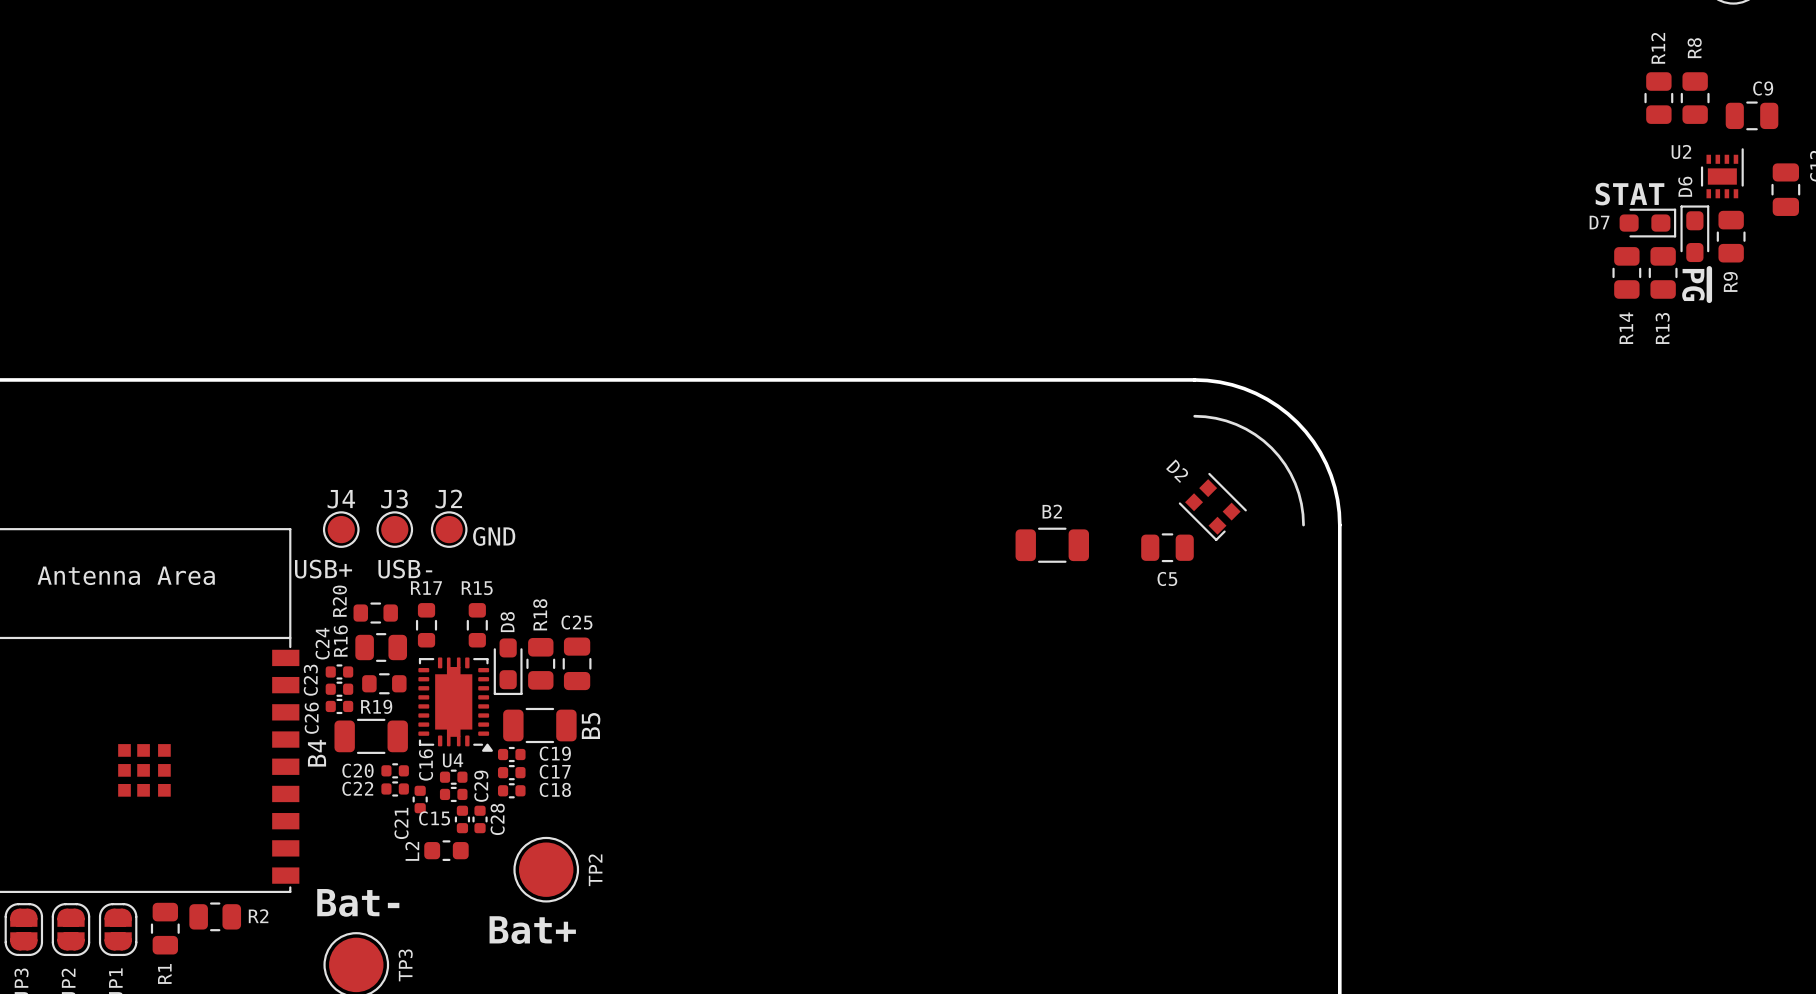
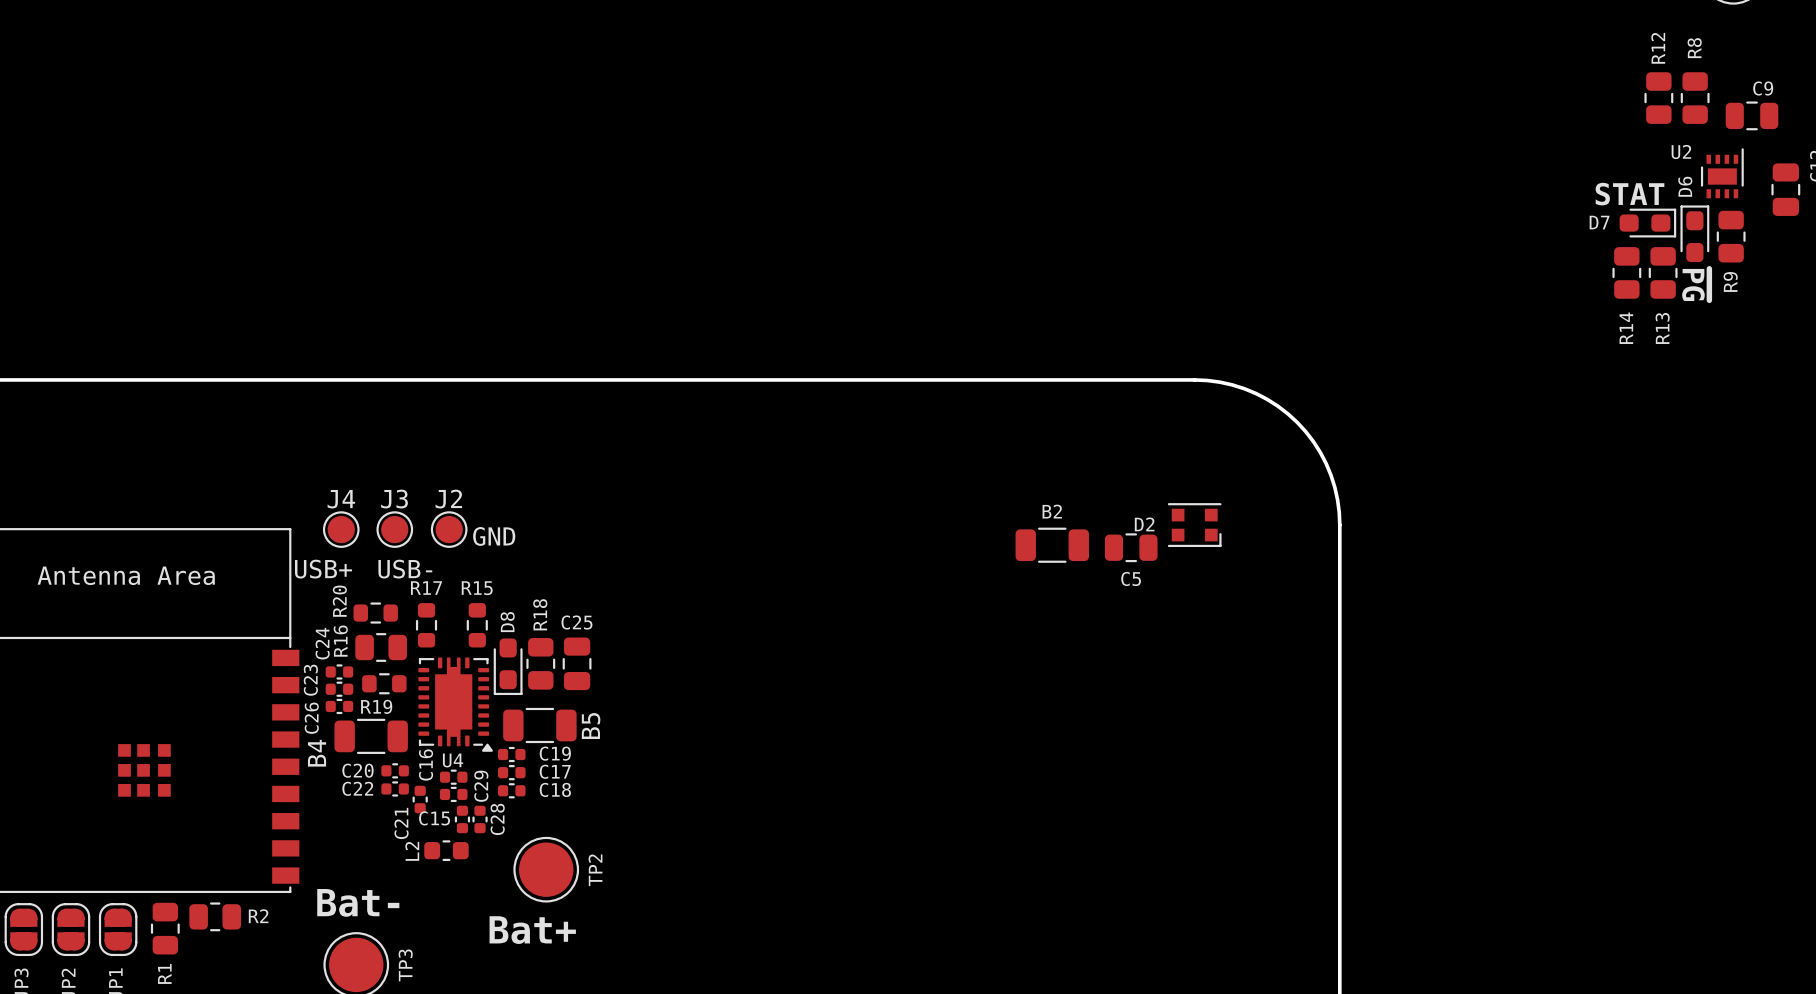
line: (1194, 416) (1215, 418) (1236, 424) (1255, 434) (1271, 448) (1285, 464) (1295, 483) (1301, 503) (1303, 525) -> none
D2 rotation: 0° (1212, 506) -> 45° counterclockwise (1194, 525)
C5 position: (1167, 547) -> (1131, 547)

